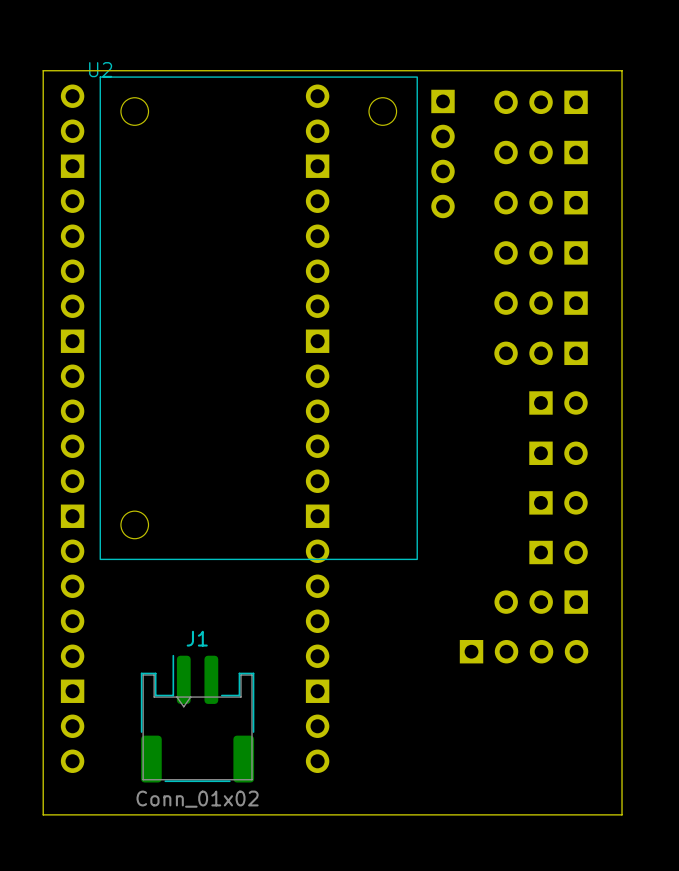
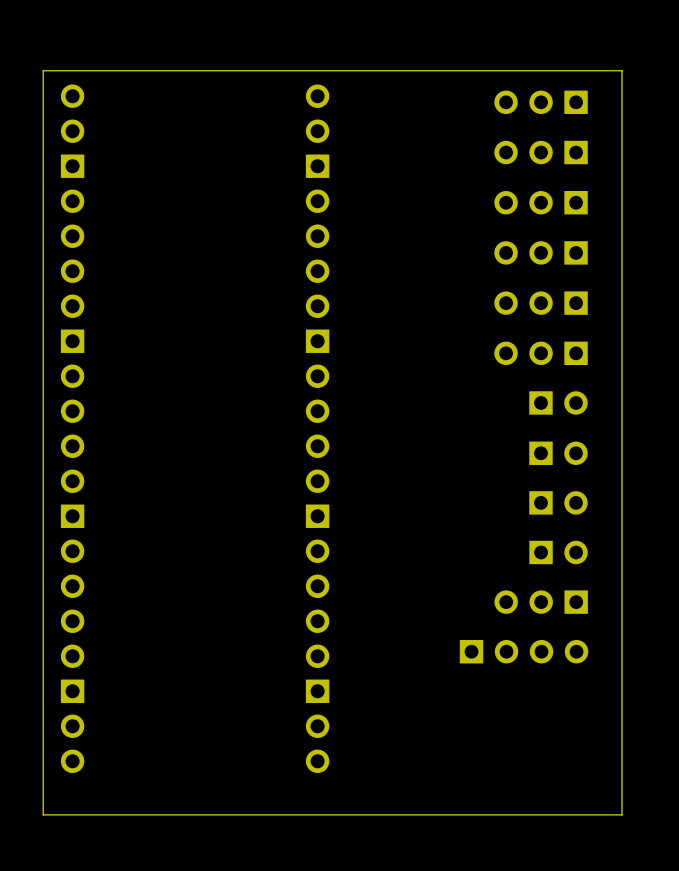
part: (443, 153) -> none
U2: (258, 318) -> none
J1: Conn_01x02 (197, 718) -> none

